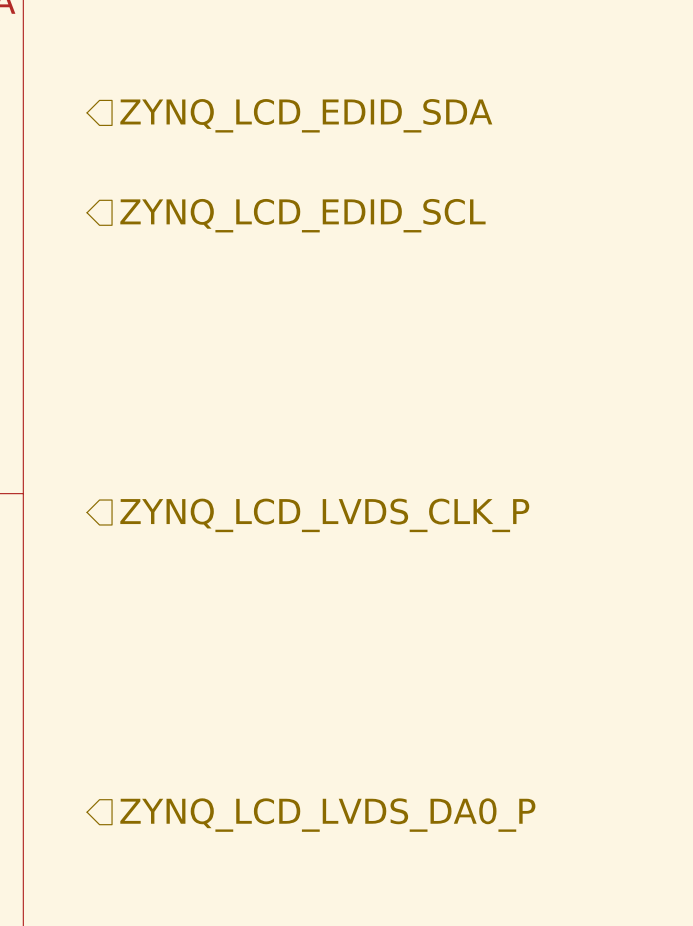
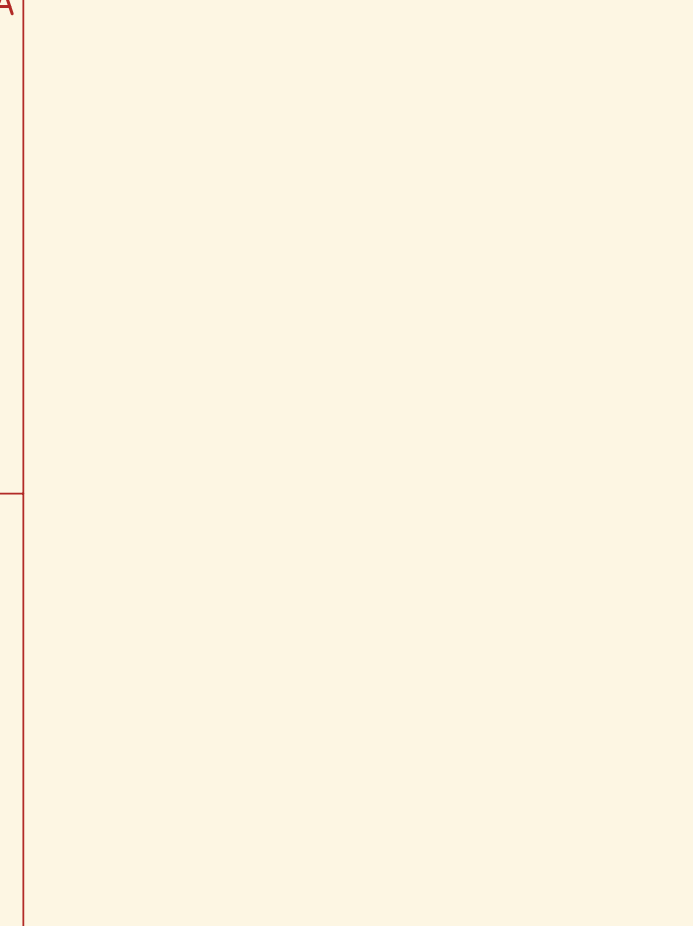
hierarchical label: ZYNQ_LCD_EDID_SDA (306, 115) -> none
hierarchical label: ZYNQ_LCD_EDID_SCL (302, 215) -> none
hierarchical label: ZYNQ_LCD_LVDS_CLK_P (324, 515) -> none
hierarchical label: ZYNQ_LCD_LVDS_DA0_P (327, 815) -> none

